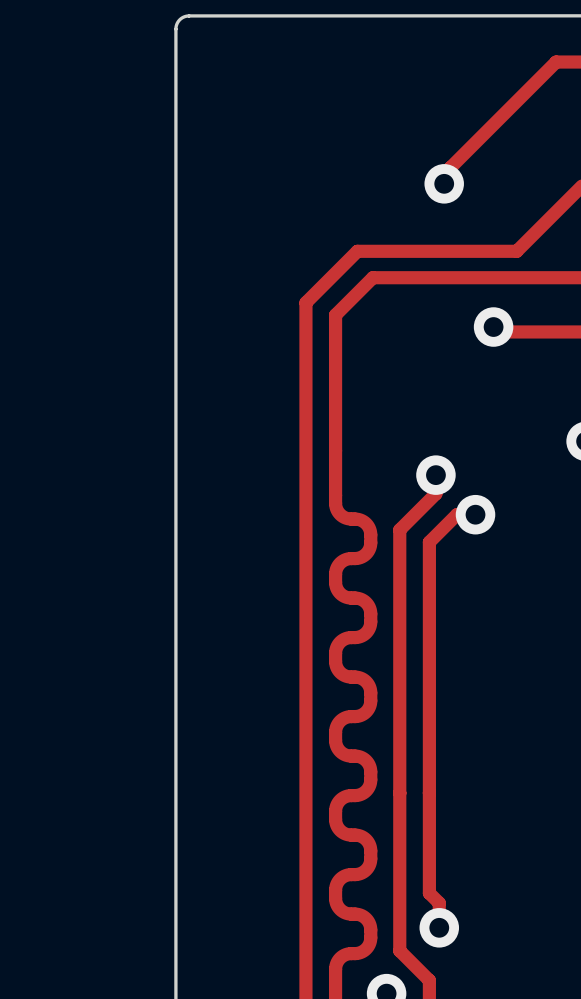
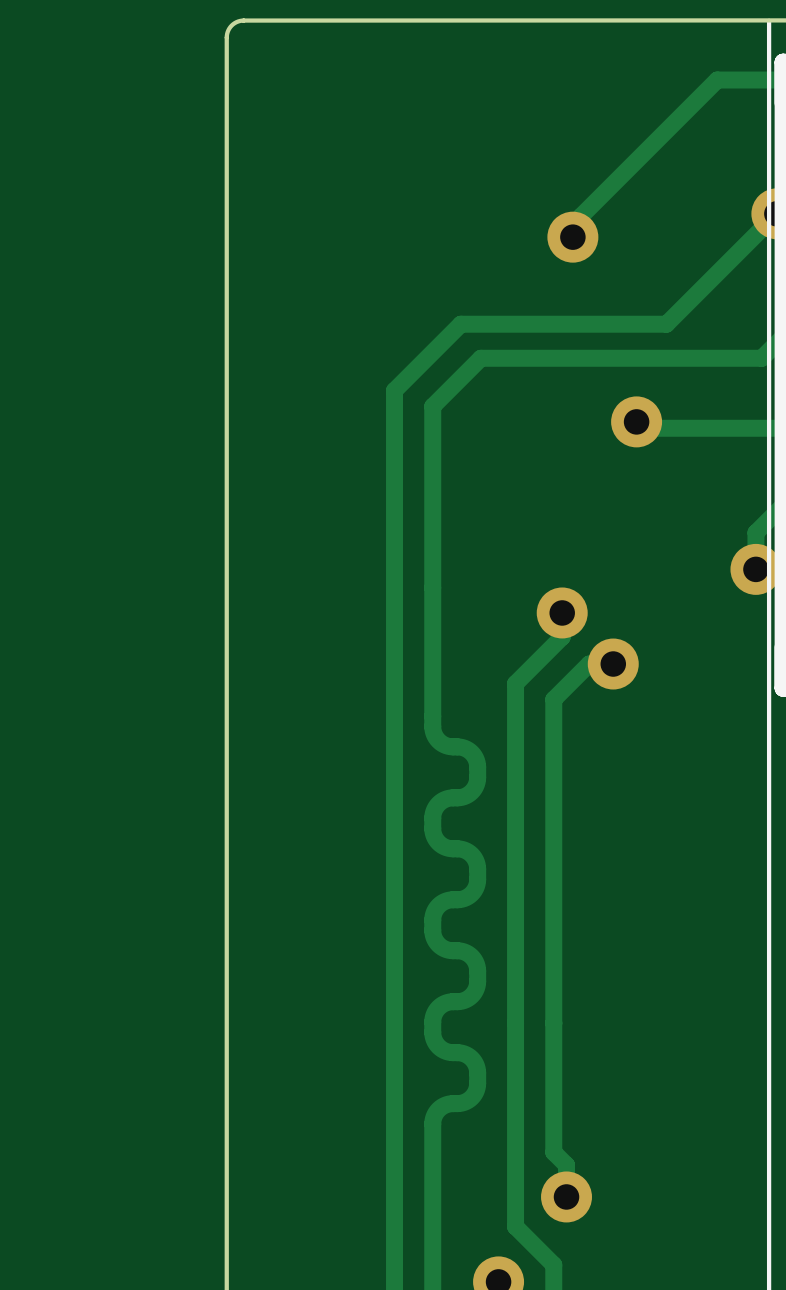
track: (335, 503) (338, 511) (342, 516) (360, 519) (366, 523) (370, 534) (370, 546) (367, 552) (360, 557) (342, 560) (338, 565) (335, 574) (335, 585) (340, 593) (346, 597) (363, 600) (368, 605) (370, 612) (370, 625) (367, 631) (360, 636) (342, 640) (337, 646) (335, 653) (335, 664) (340, 672) (346, 676) (363, 679) (368, 684) (370, 691) (370, 704) (367, 710) (360, 715) (342, 719) (338, 723) (335, 732) (335, 743) (340, 751) (346, 755) (363, 758) (370, 768) (370, 781) (368, 788) (361, 794) (347, 795) (340, 800) (335, 807) (335, 819) (338, 827) (342, 832) (360, 835) (367, 841) (370, 847) (370, 860) (368, 867) (363, 872) (341, 878) (337, 883) (335, 890) -> (432, 649) (433, 733) (438, 740) (444, 744) (461, 747) (469, 751) (475, 758) (477, 767) (477, 781) (471, 791) (464, 796) (442, 800) (435, 807) (432, 815) (433, 832) (437, 841) (446, 847) (468, 851) (474, 858) (477, 869) (477, 883) (471, 893) (464, 898) (444, 901) (435, 909) (432, 917) (433, 937) (438, 944) (444, 948) (461, 951) (469, 955) (475, 962) (477, 971) (477, 985) (471, 995) (464, 1000) (444, 1003) (435, 1011) (432, 1019) (432, 1034) (435, 1043) (442, 1049) (464, 1053) (471, 1058) (477, 1068) (477, 1083) (475, 1092) (469, 1099) (461, 1103) (446, 1104) (435, 1113) (432, 1121) (432, 1148)
track: (335, 898) (338, 906) (342, 911) (360, 914) (366, 918) (370, 929) (370, 941) (367, 947) (360, 952) (342, 956) (338, 960) (335, 969) -> (432, 1158) (432, 1250)

